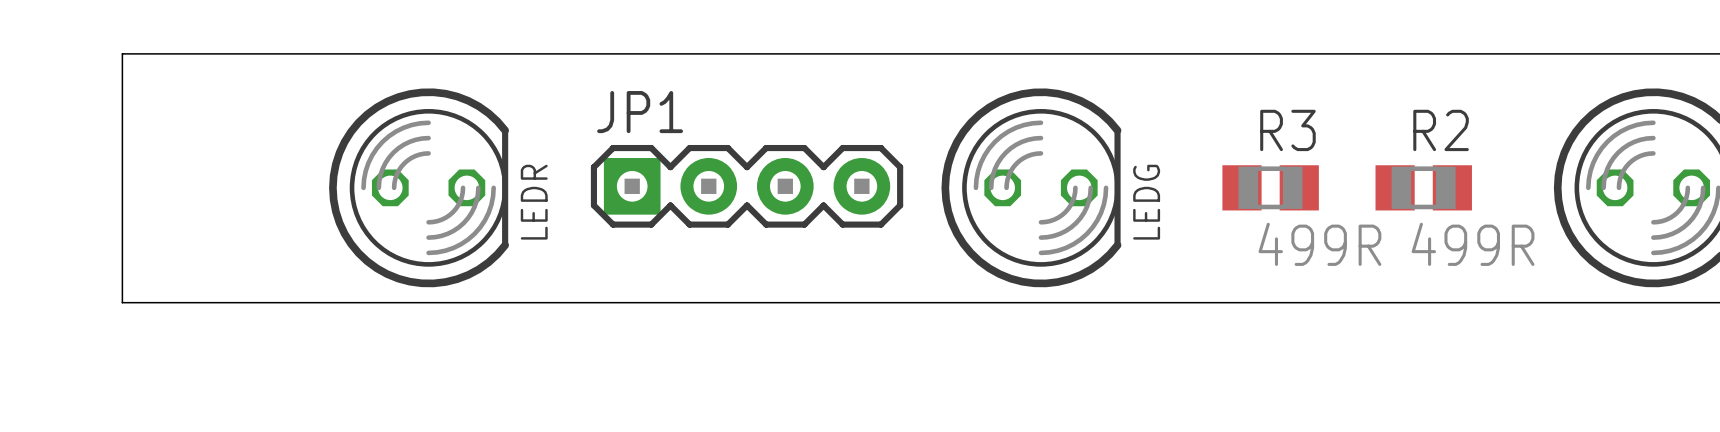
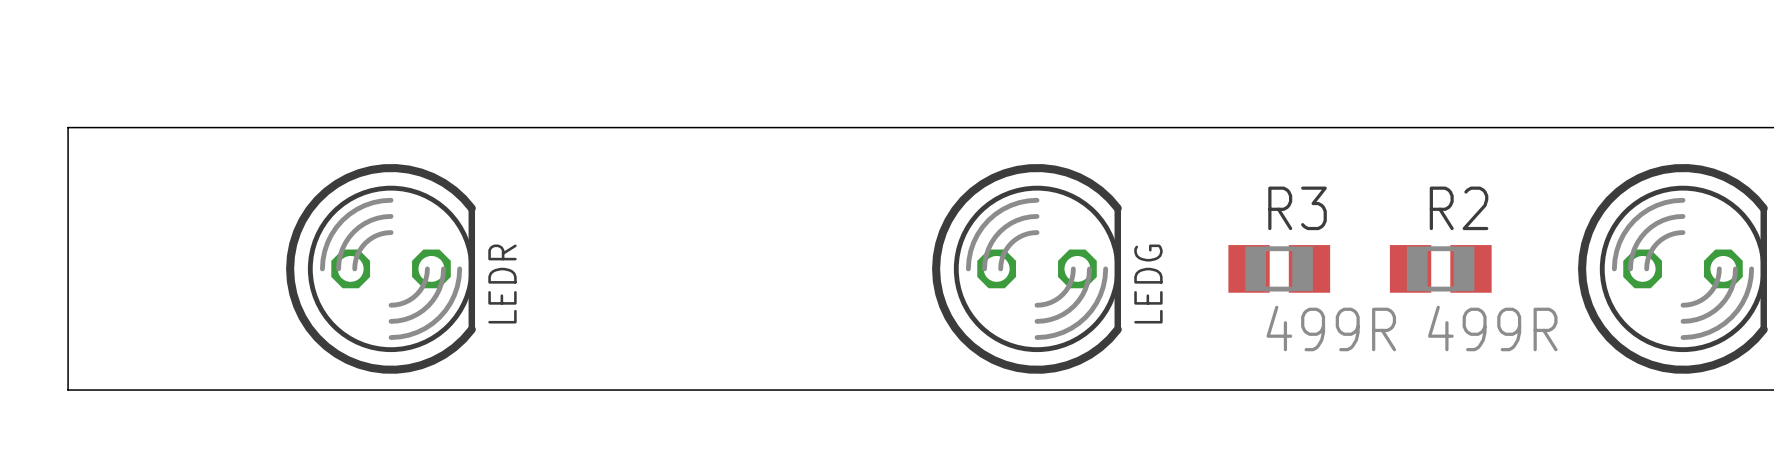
JP1: (747, 186) -> none

